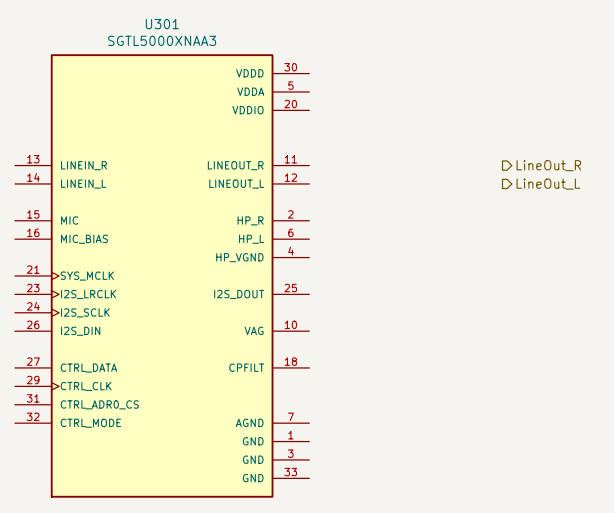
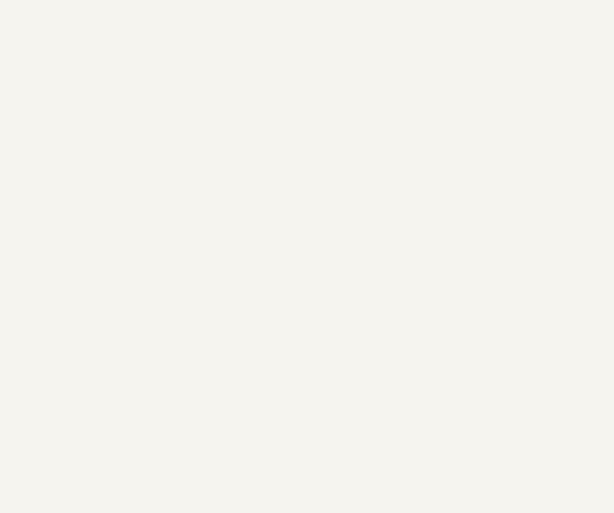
hierarchical label: LineOut_R (548, 165) -> none
hierarchical label: LineOut_L (548, 184) -> none
U301: SGTL5000XNAA3 (162, 275) -> none

